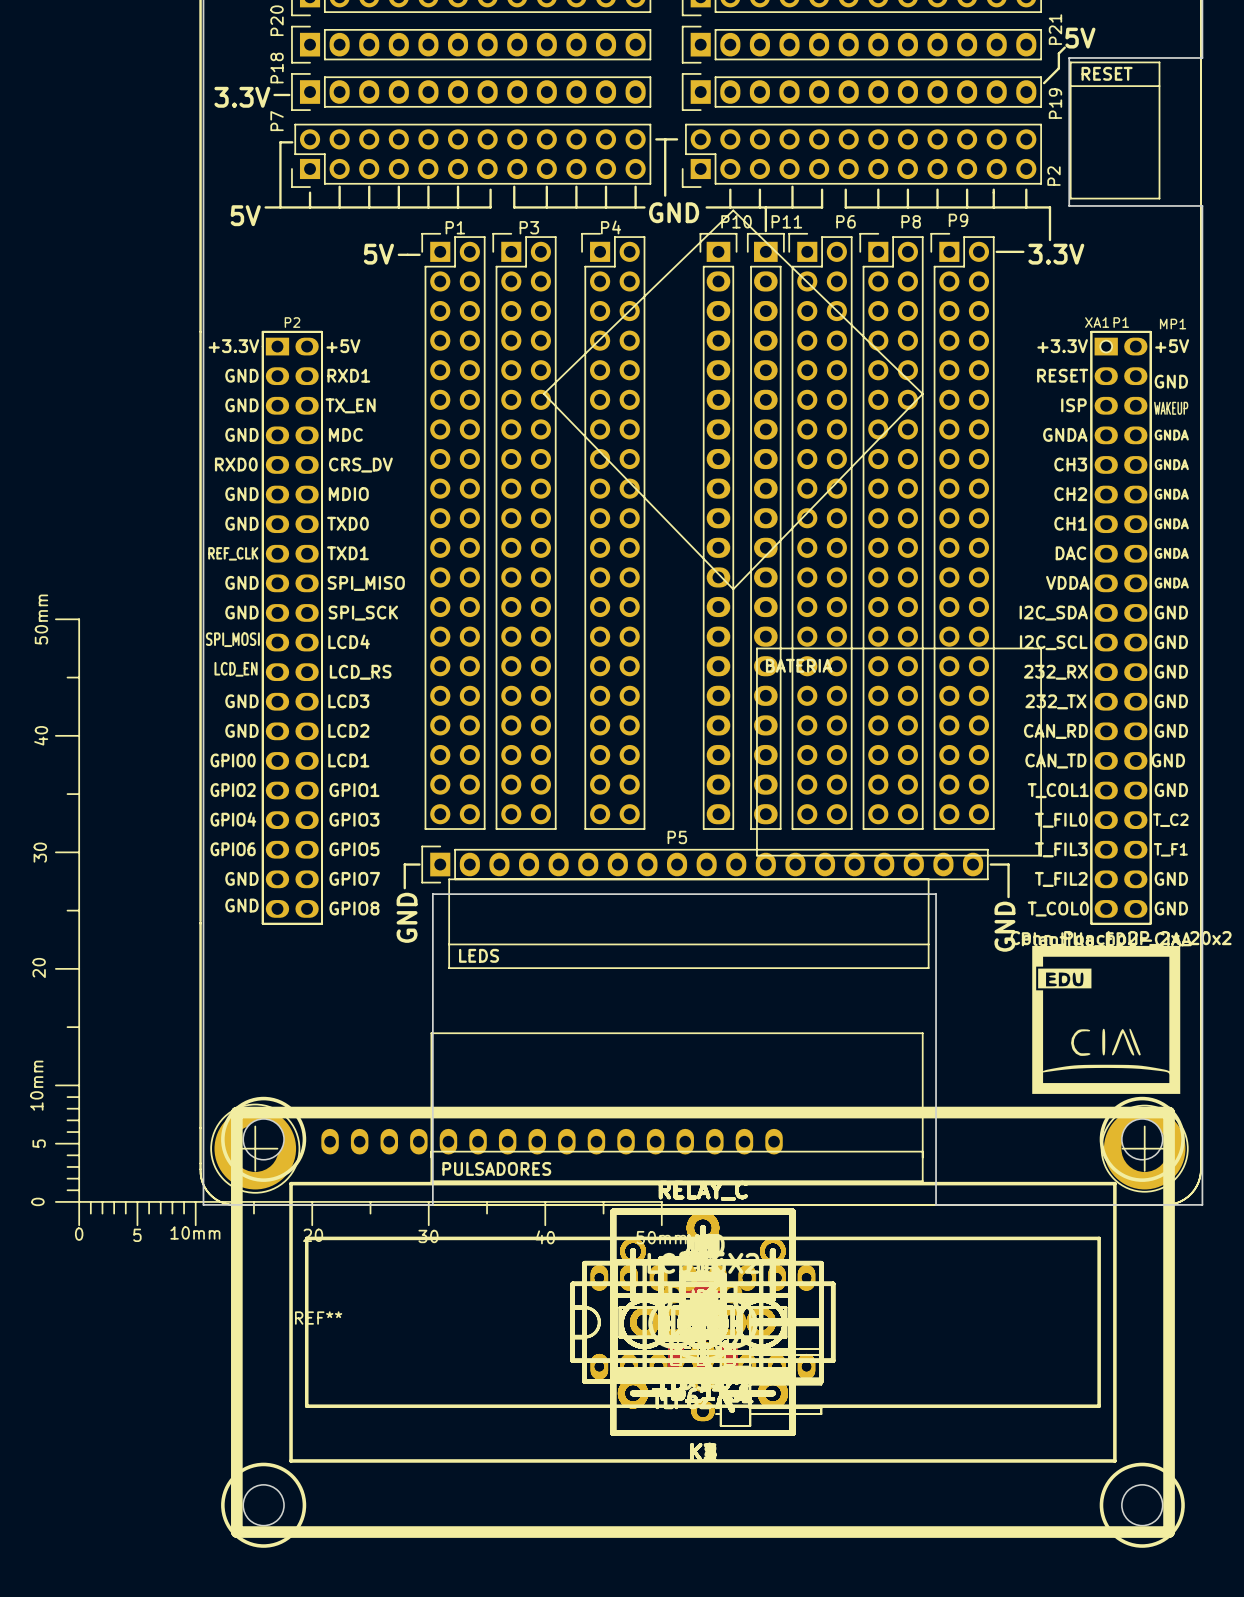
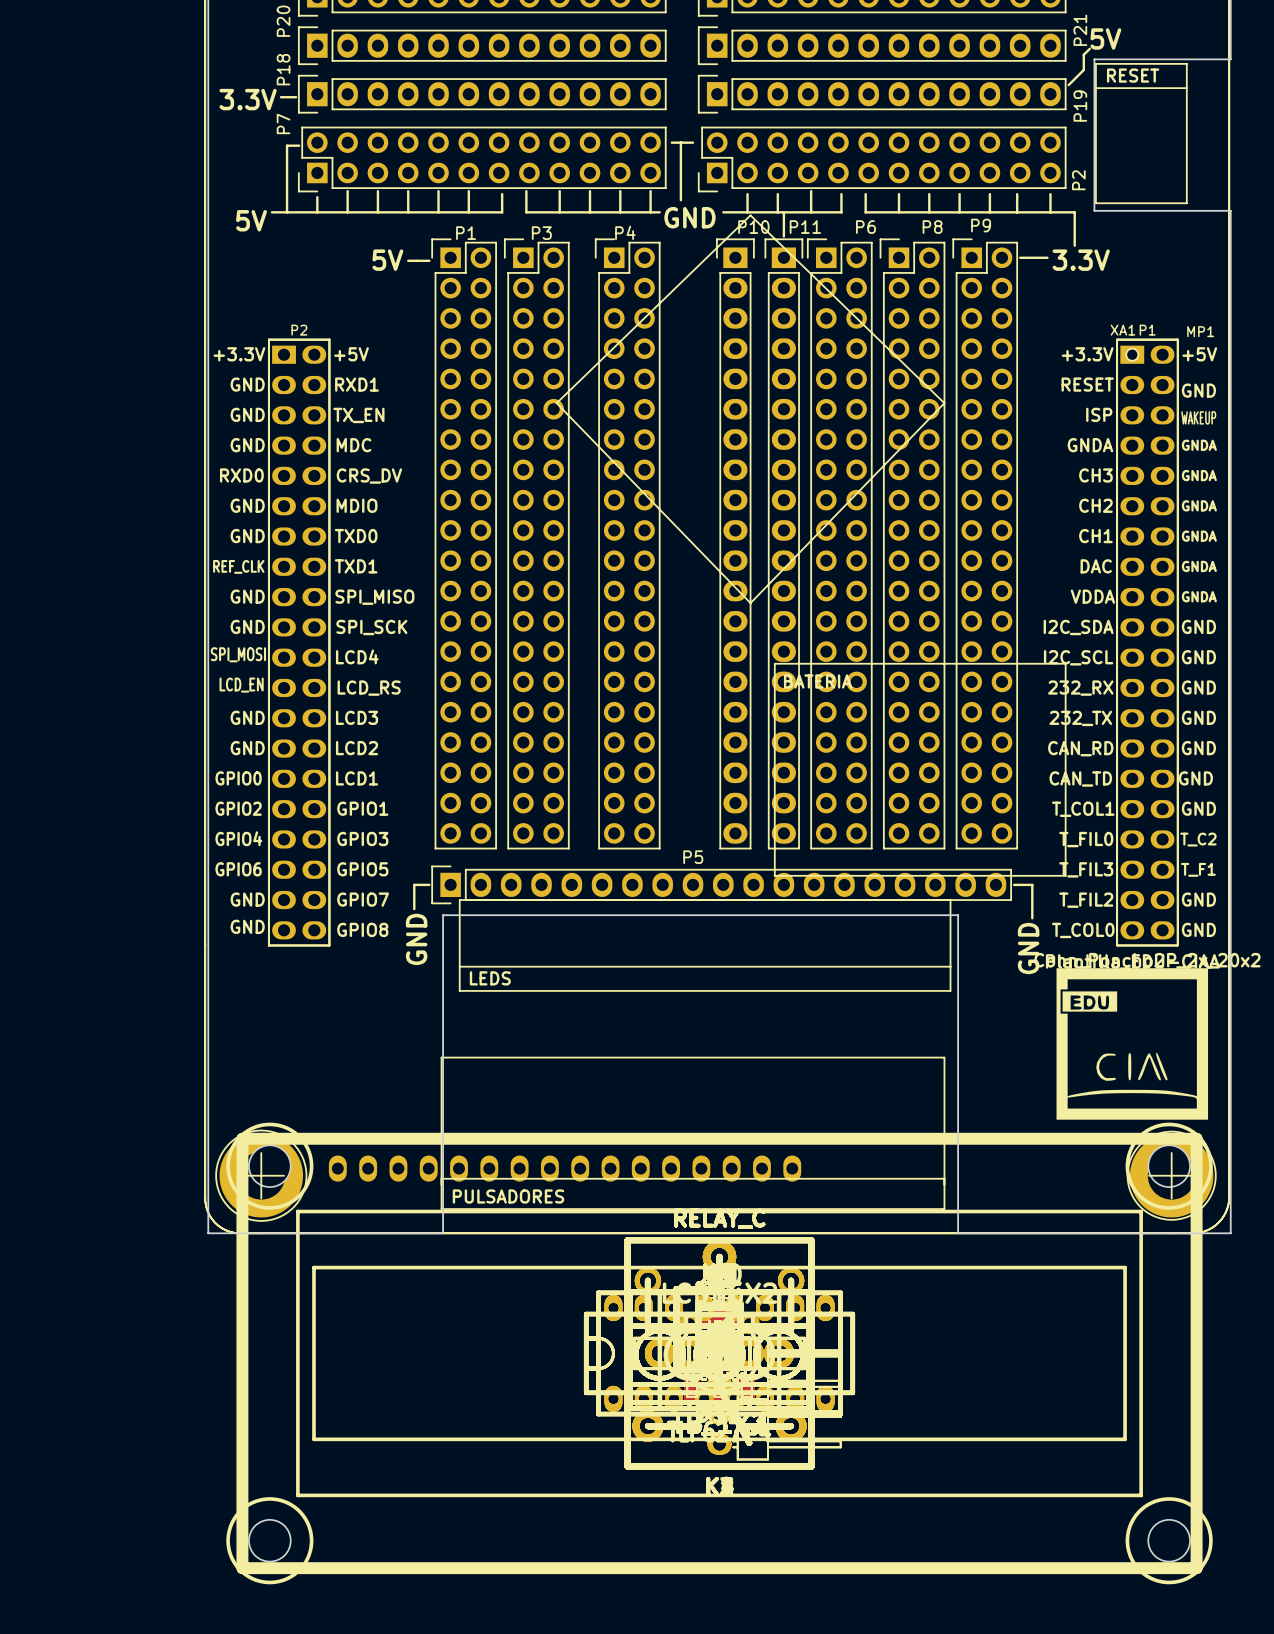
REF**: (358, 922) -> none

